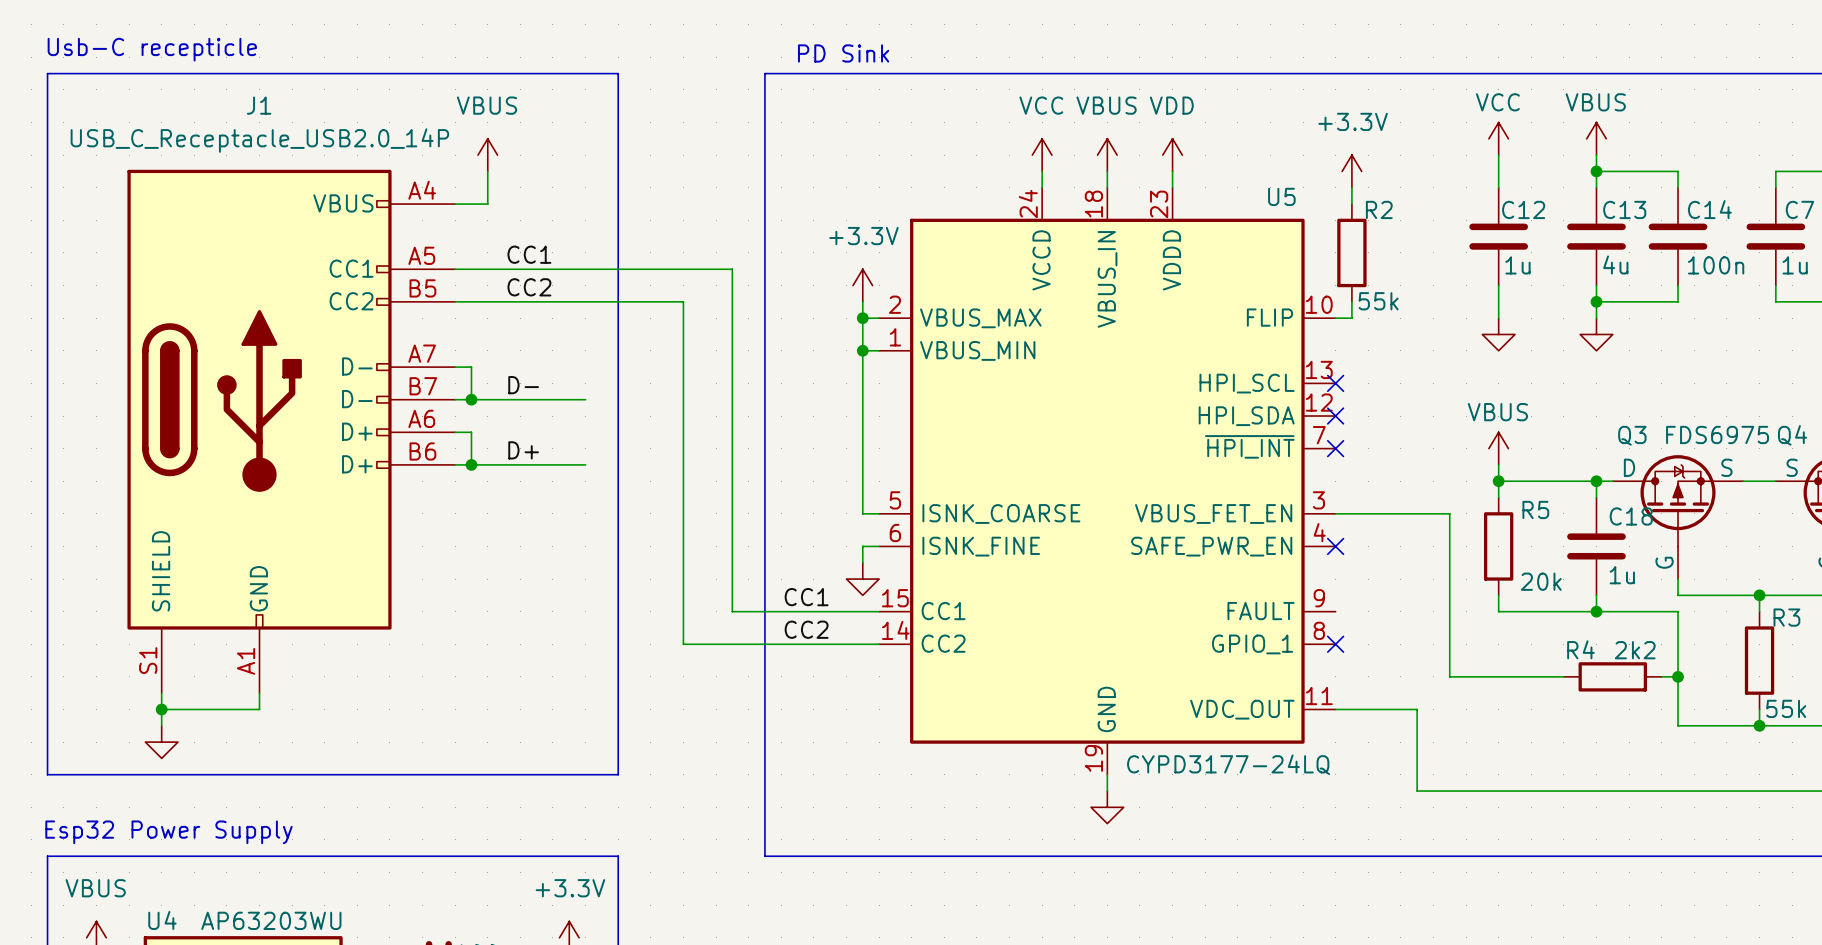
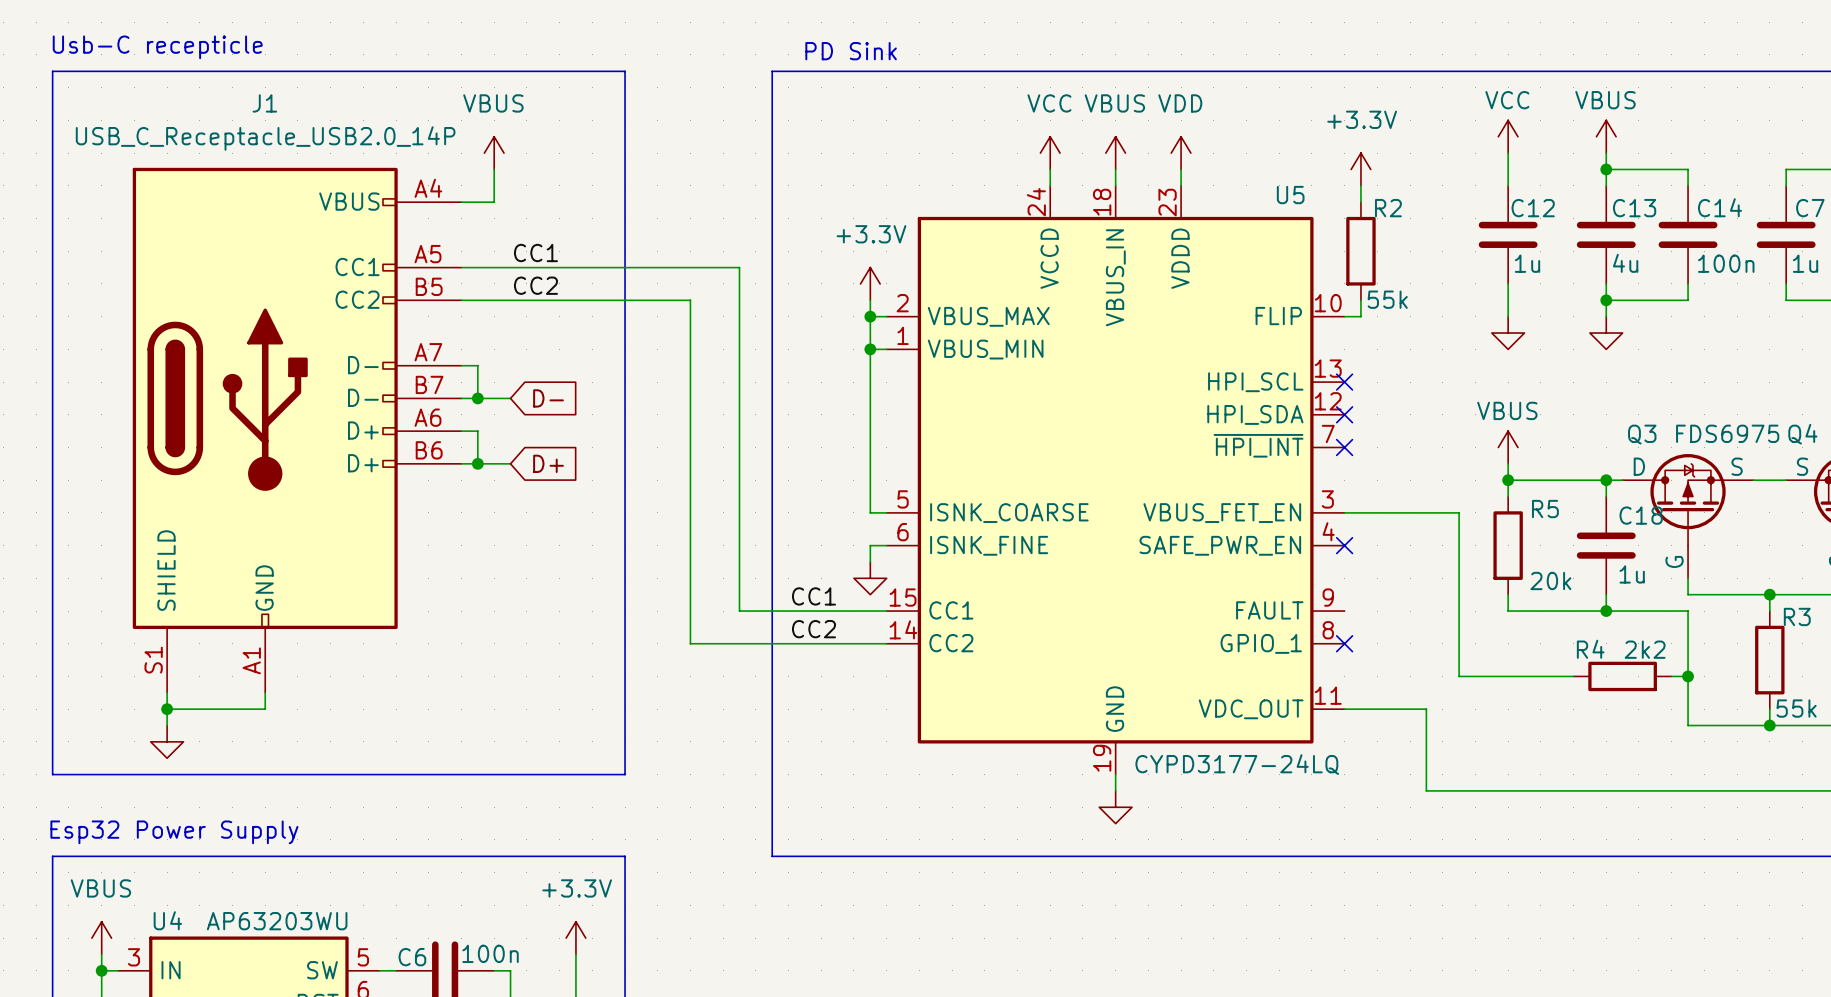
label: D- (523, 385) -> none
wire: (504, 399) (585, 399) -> none
global label: none -> D- (548, 398)
label: D+ (523, 450) -> none
wire: (504, 464) (585, 464) -> none
global label: none -> D+ (548, 463)

